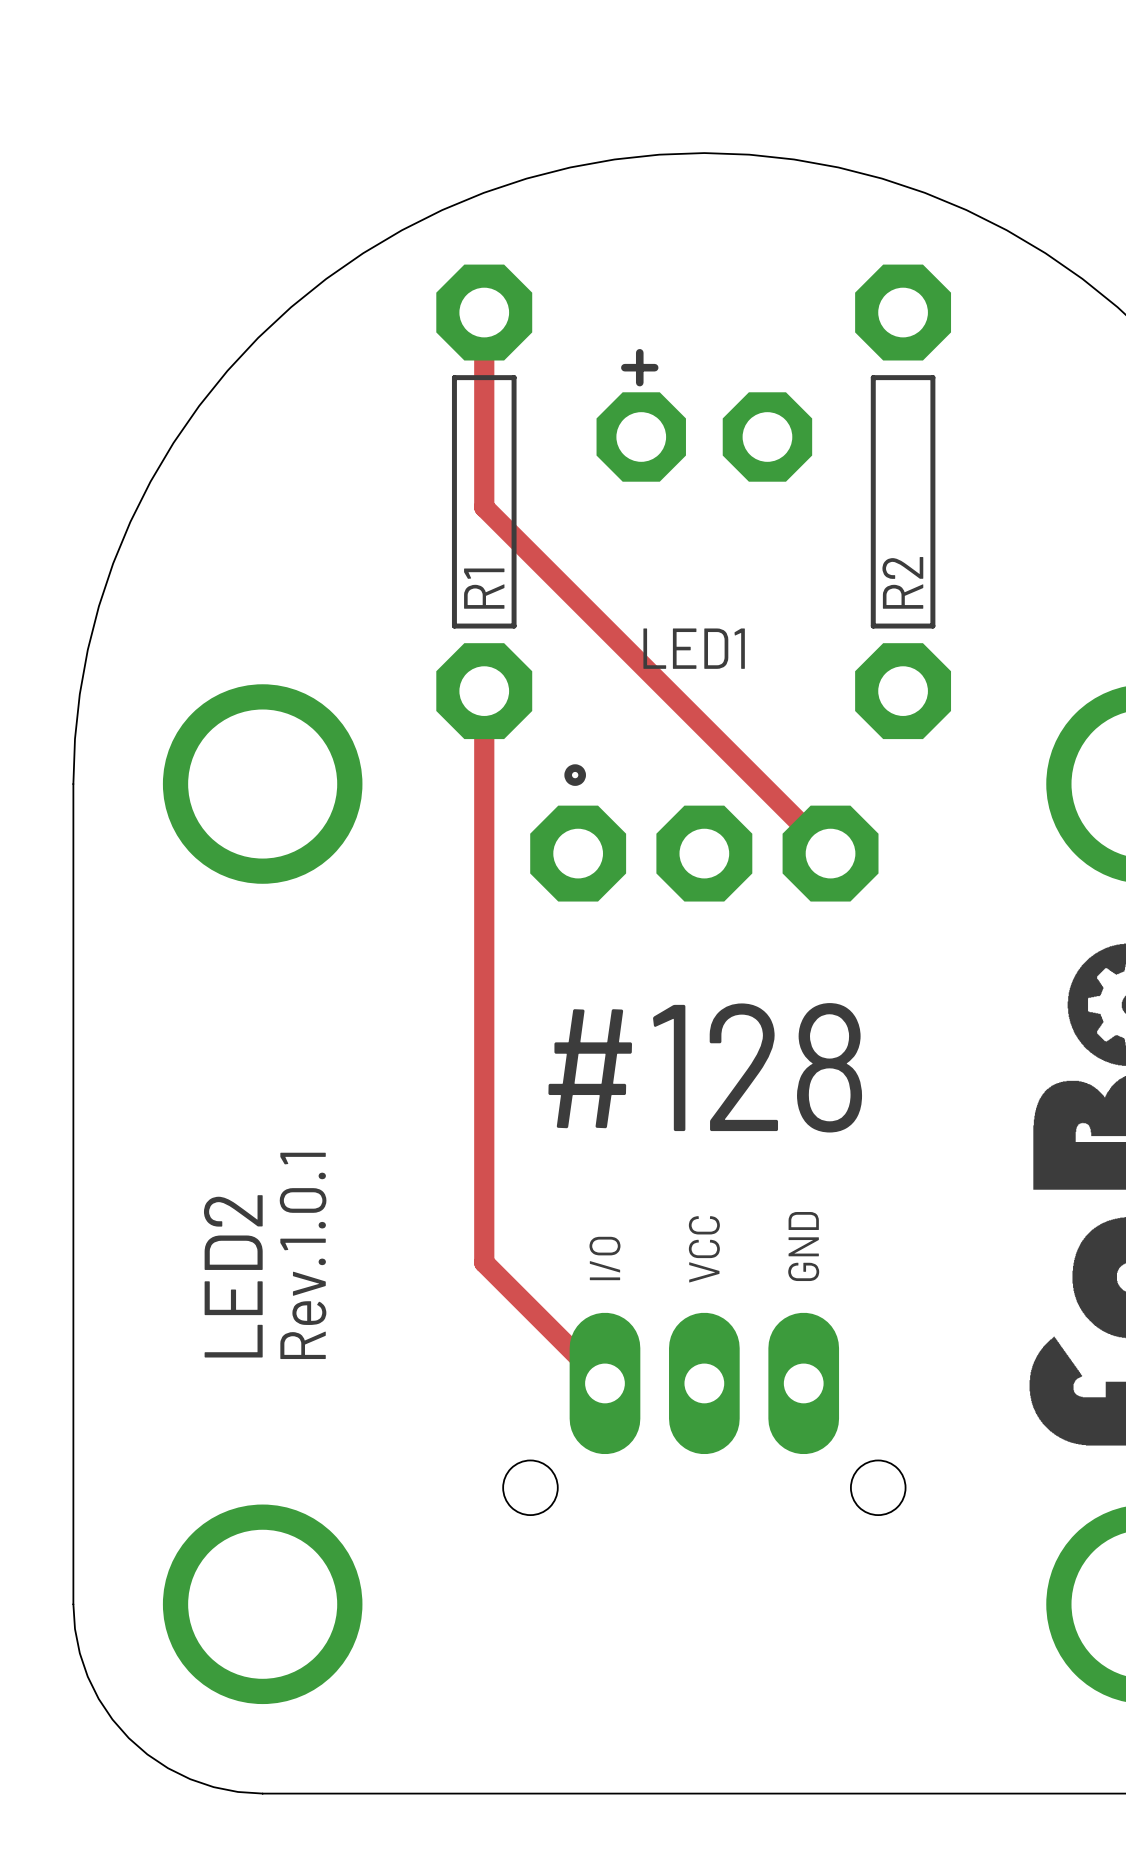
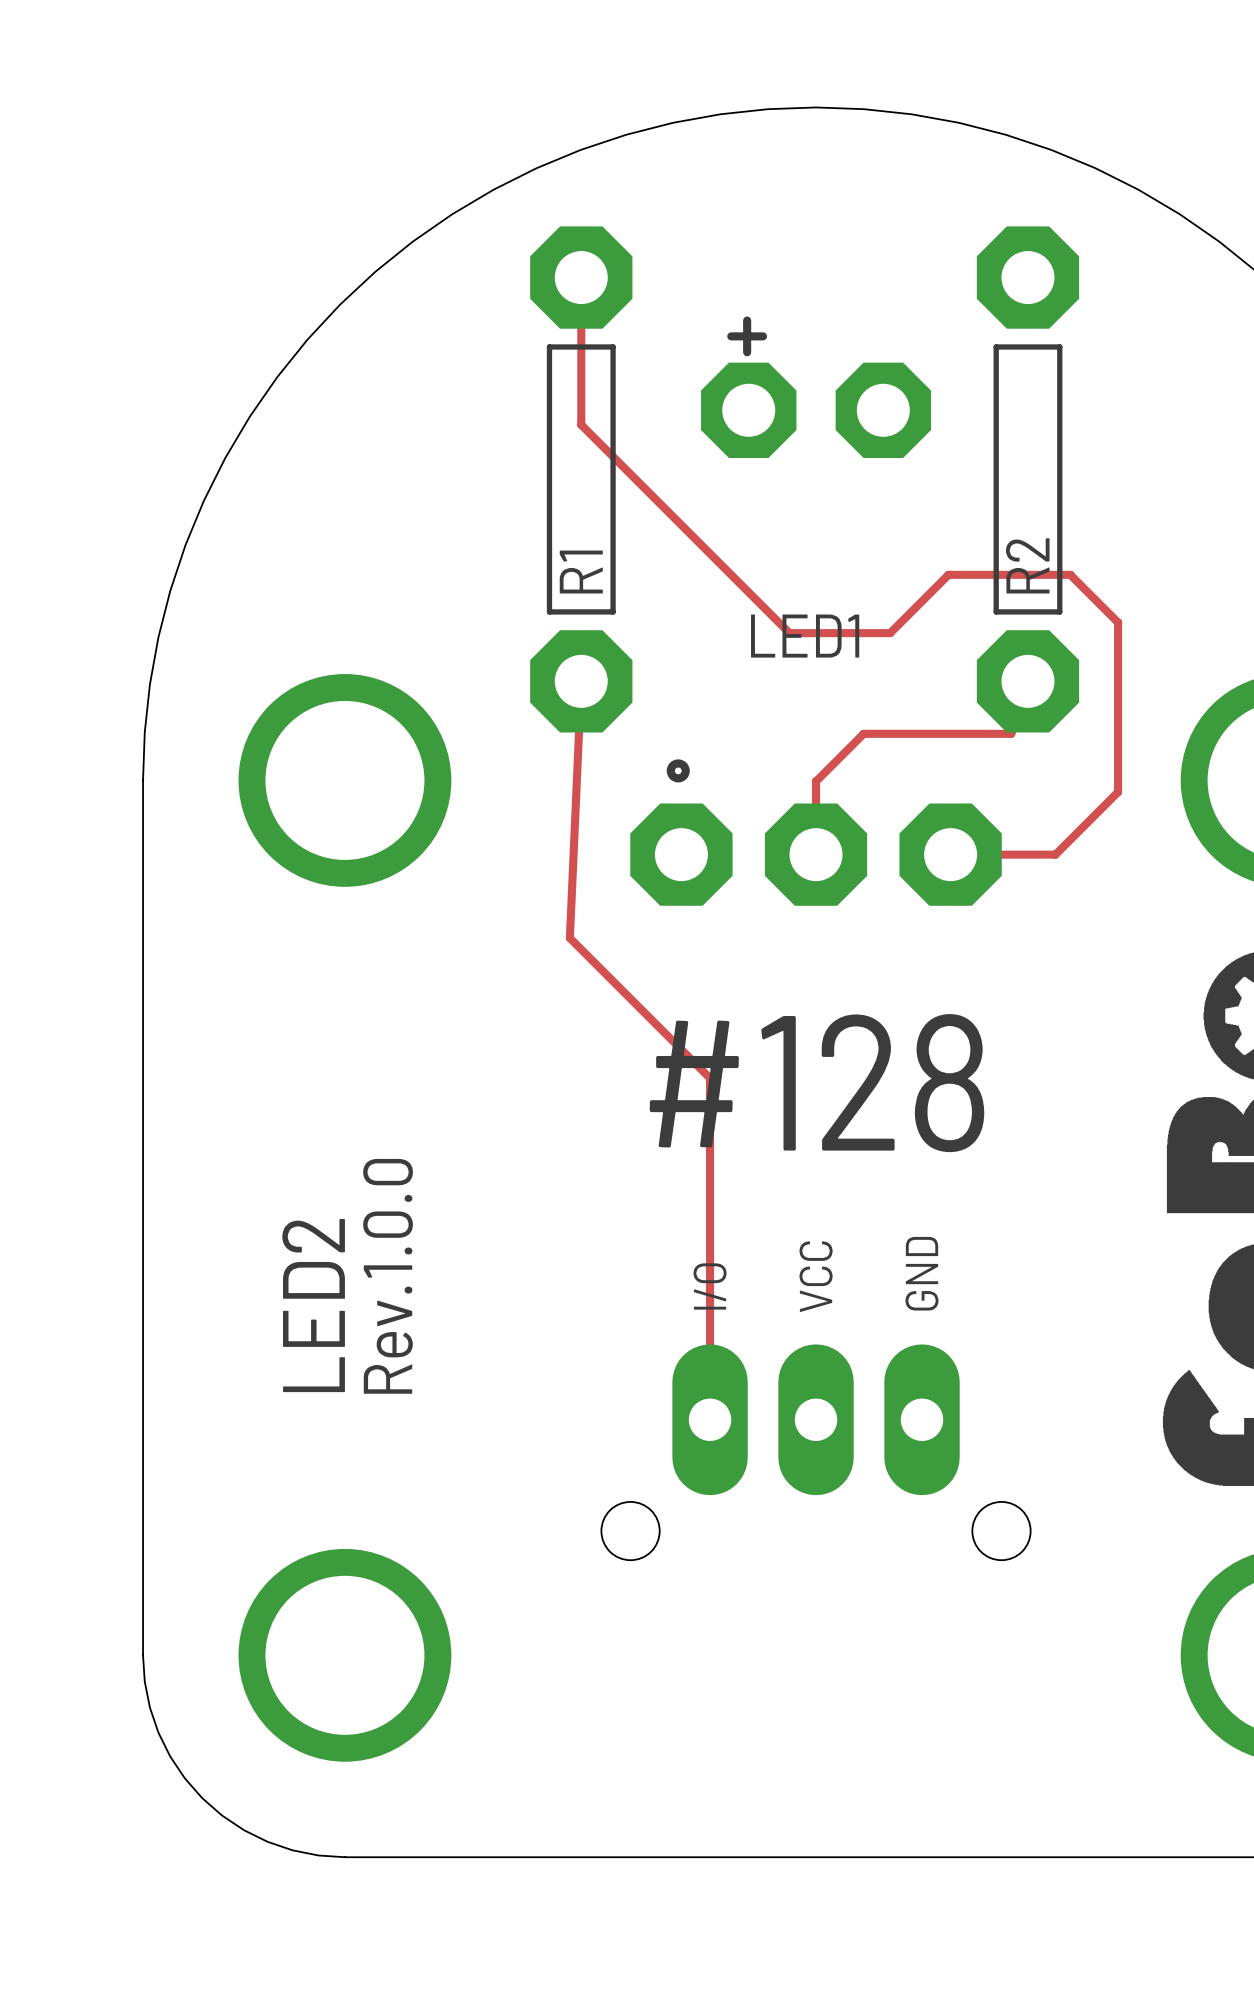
track width: thick (484, 312) (484, 450) -> thin (581, 277) (581, 424)
track: (484, 450) (484, 507) (830, 853) -> (581, 424) (789, 633) (890, 633) (948, 574) (1070, 574) (1118, 622) (1118, 792) (1055, 854) (950, 854)
track: (484, 691) (484, 1262) (604, 1383) -> (581, 681) (569, 938) (710, 1078) (710, 1419)
track: none -> (1027, 681) (1011, 733) (863, 733) (816, 781) (816, 854)
text: Rev.1.0.1 (303, 1255) -> Rev.1.0.0 (388, 1276)

